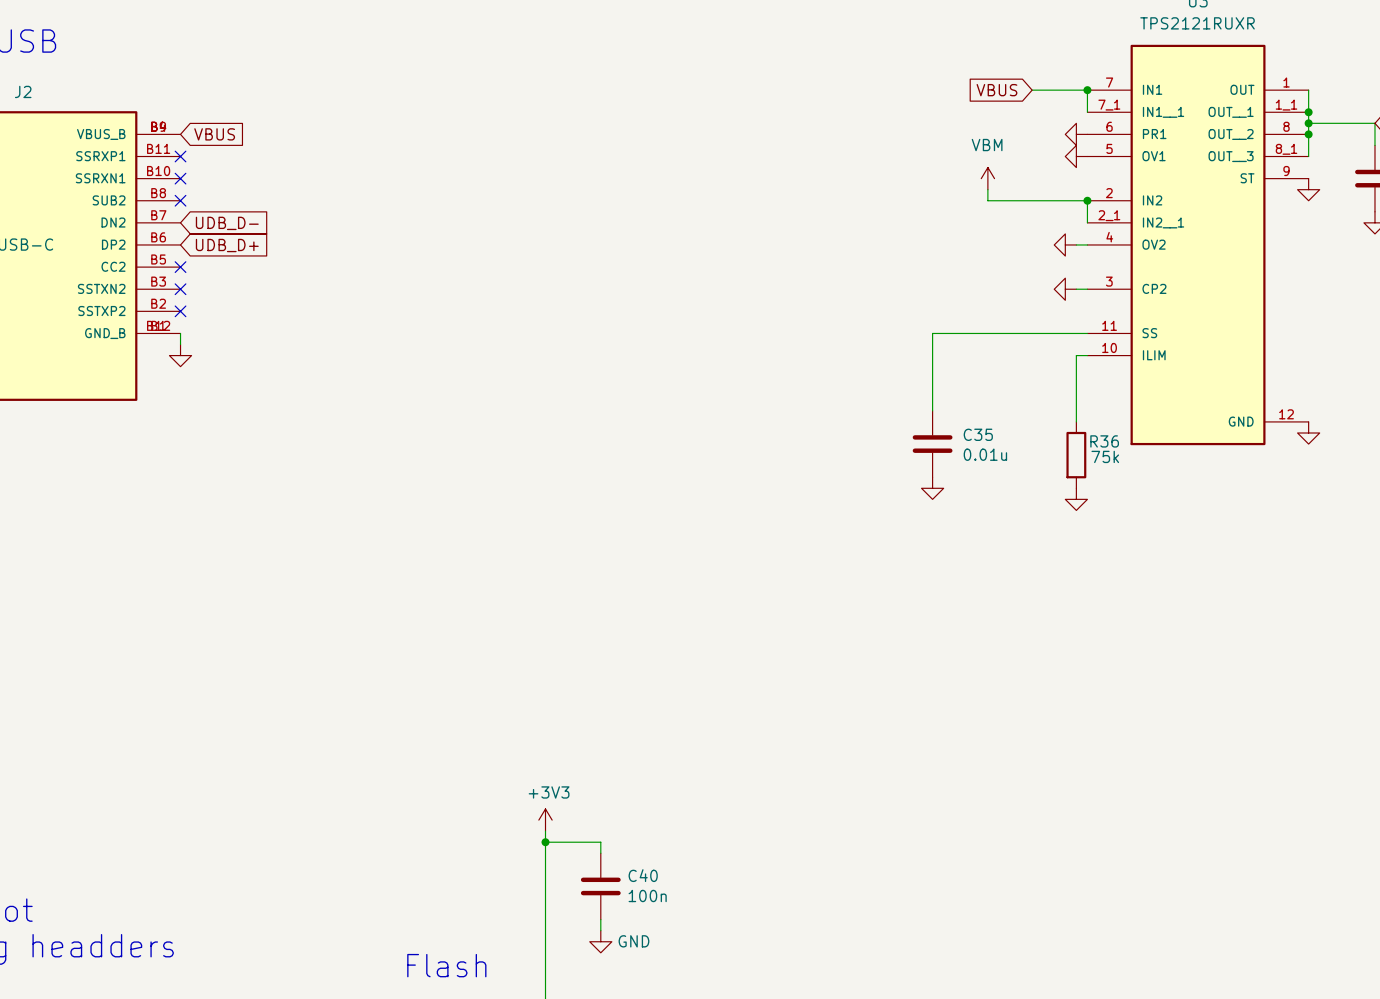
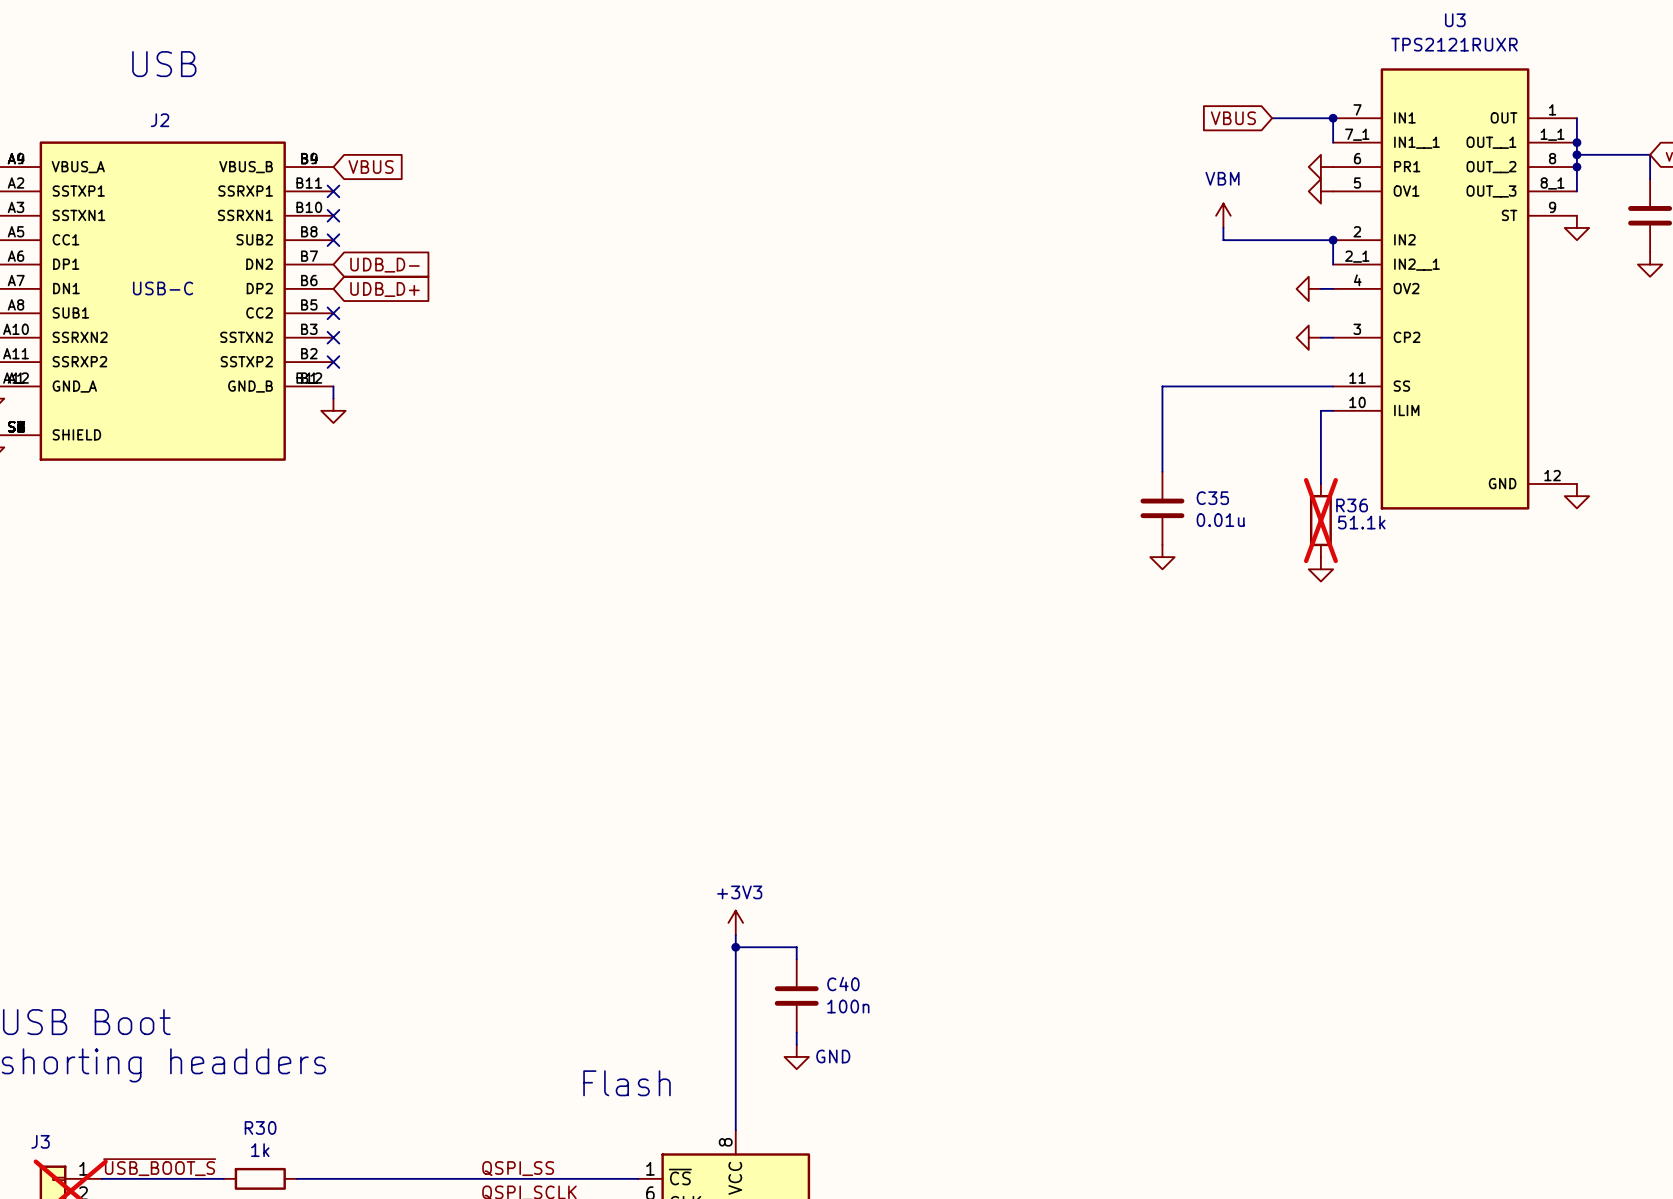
R36 do-not-place cross: none -> (1320, 520)
R36 value: 75k (1105, 456) -> 51.1k (1361, 522)

